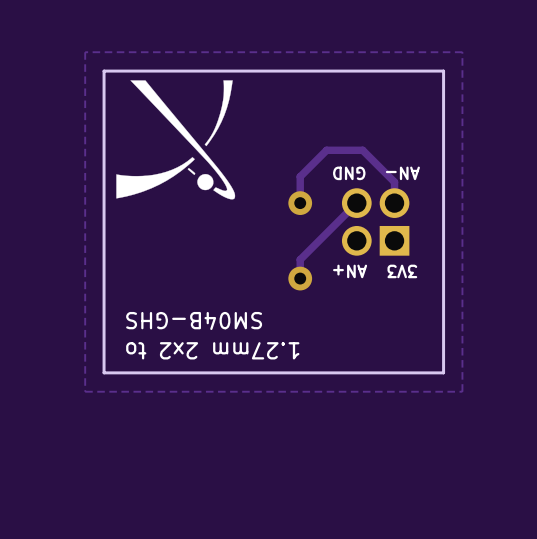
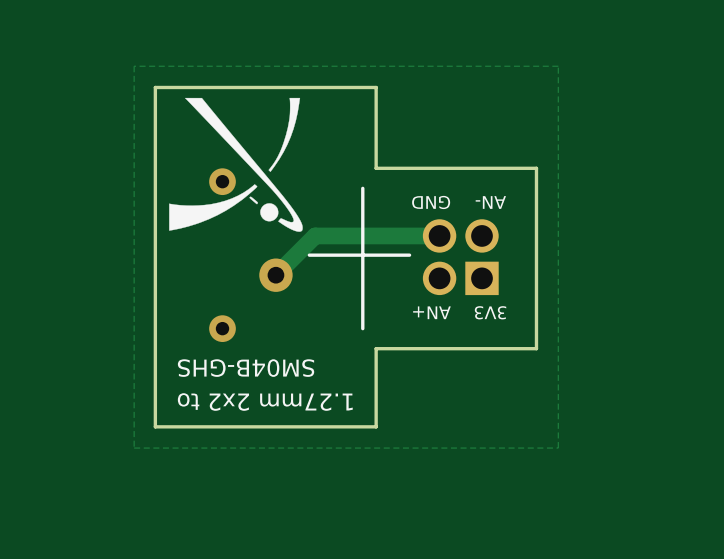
board edge: (300, 71) (443, 71) (443, 372) (300, 372) -> (376, 87) (376, 168) (536, 168) (536, 348) (376, 348) (376, 426)
via: none -> (222, 181)
line: none -> (362, 188) (362, 328)
via: (300, 203) -> none
track: (356, 203) (300, 259) (300, 278) -> (439, 235) (315, 235) (275, 275)
track: (394, 203) (394, 182) (362, 150) (326, 150) (300, 176) (300, 203) -> none
line: none -> (409, 255) (309, 255)
via: none -> (275, 275)
via: (300, 278) -> none
via: none -> (222, 328)

